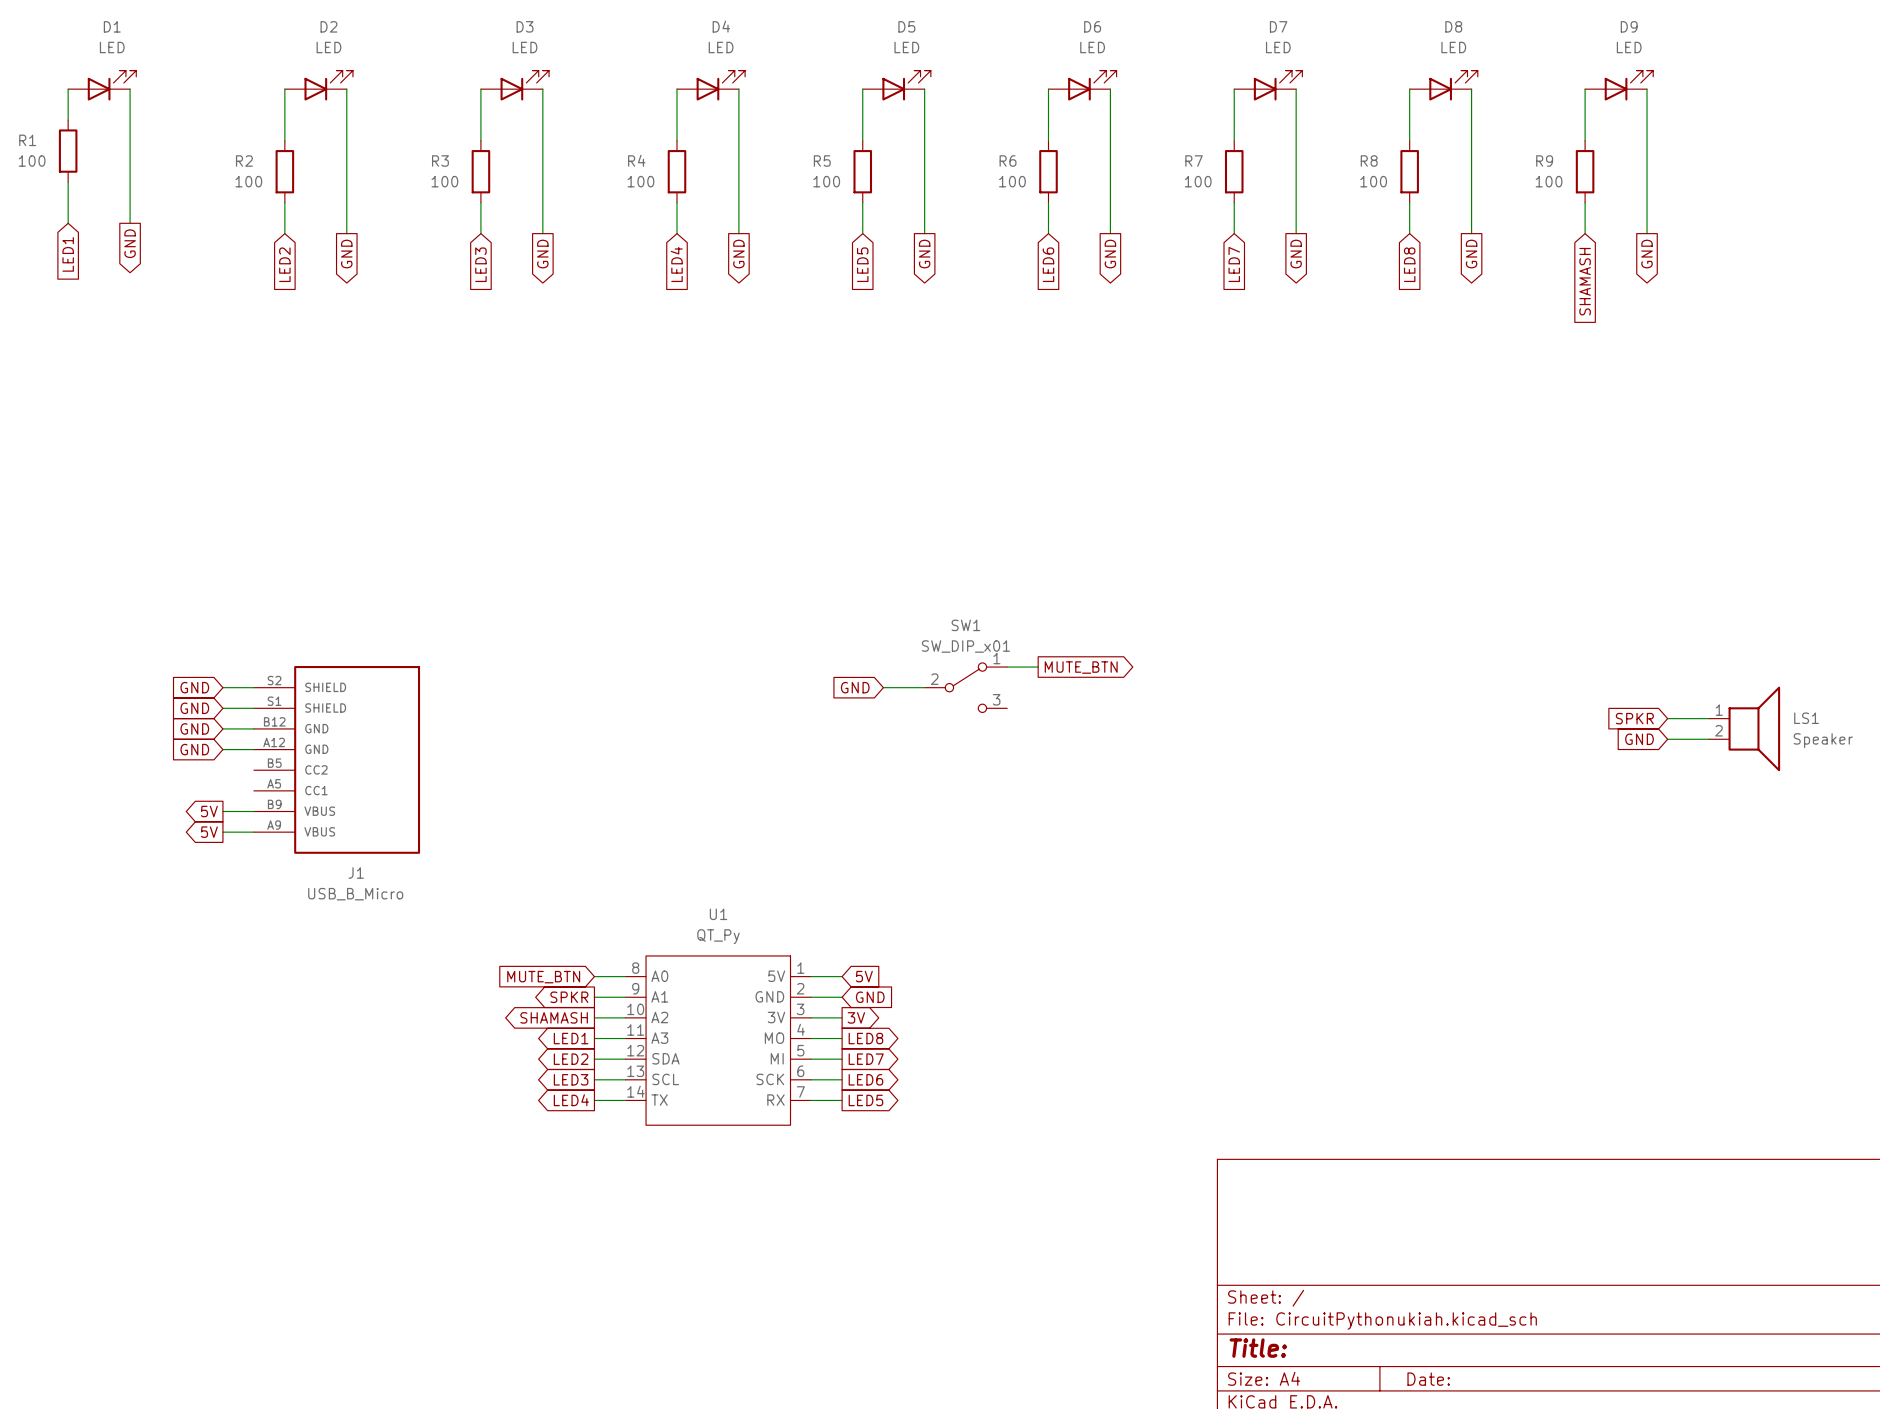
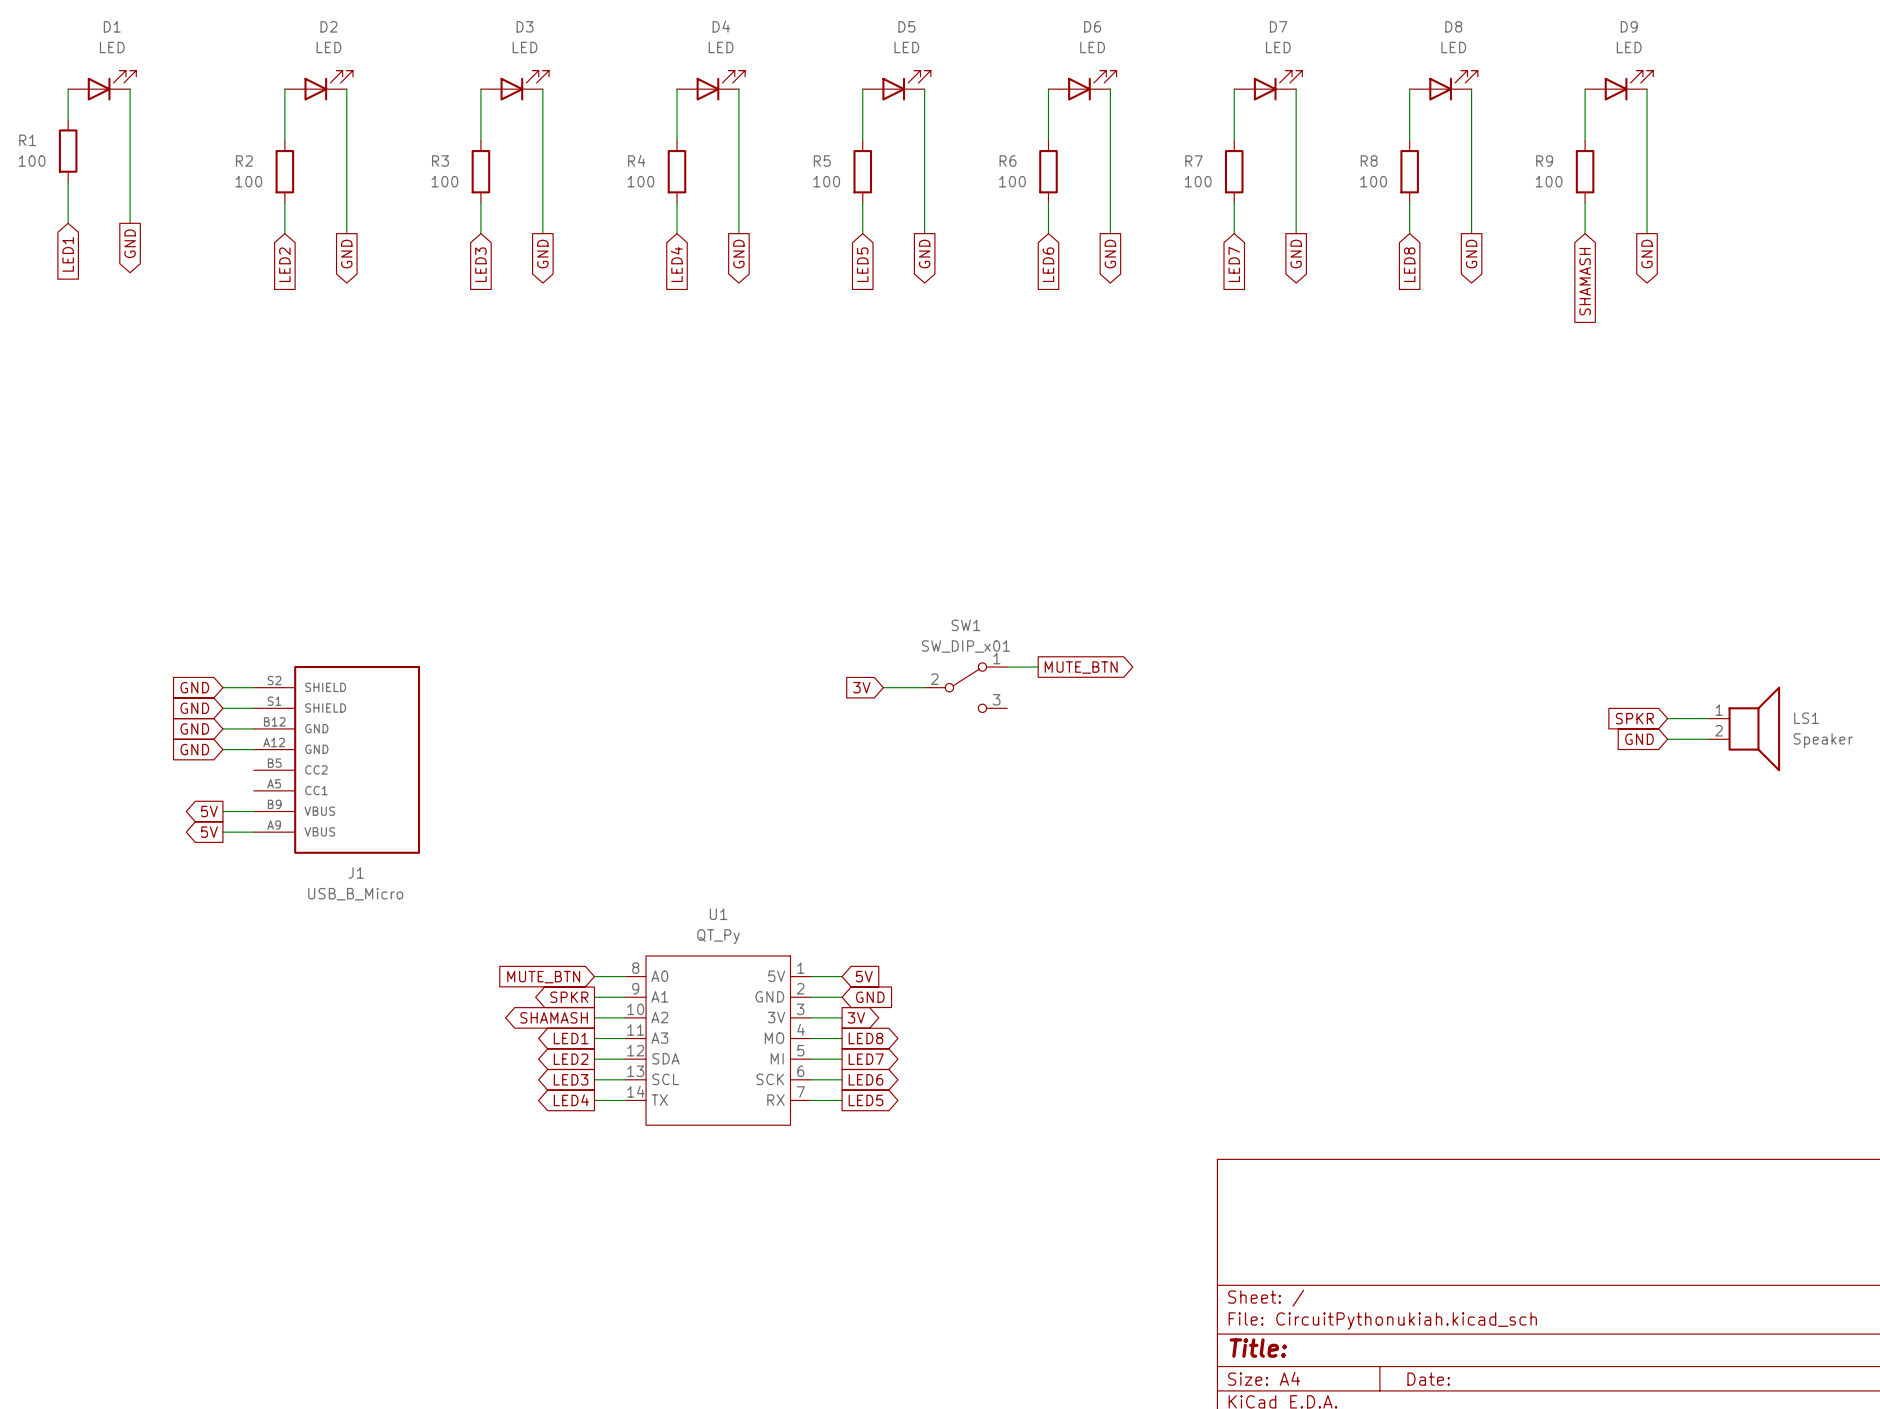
global label: GND (855, 687) -> 3V (861, 687)

